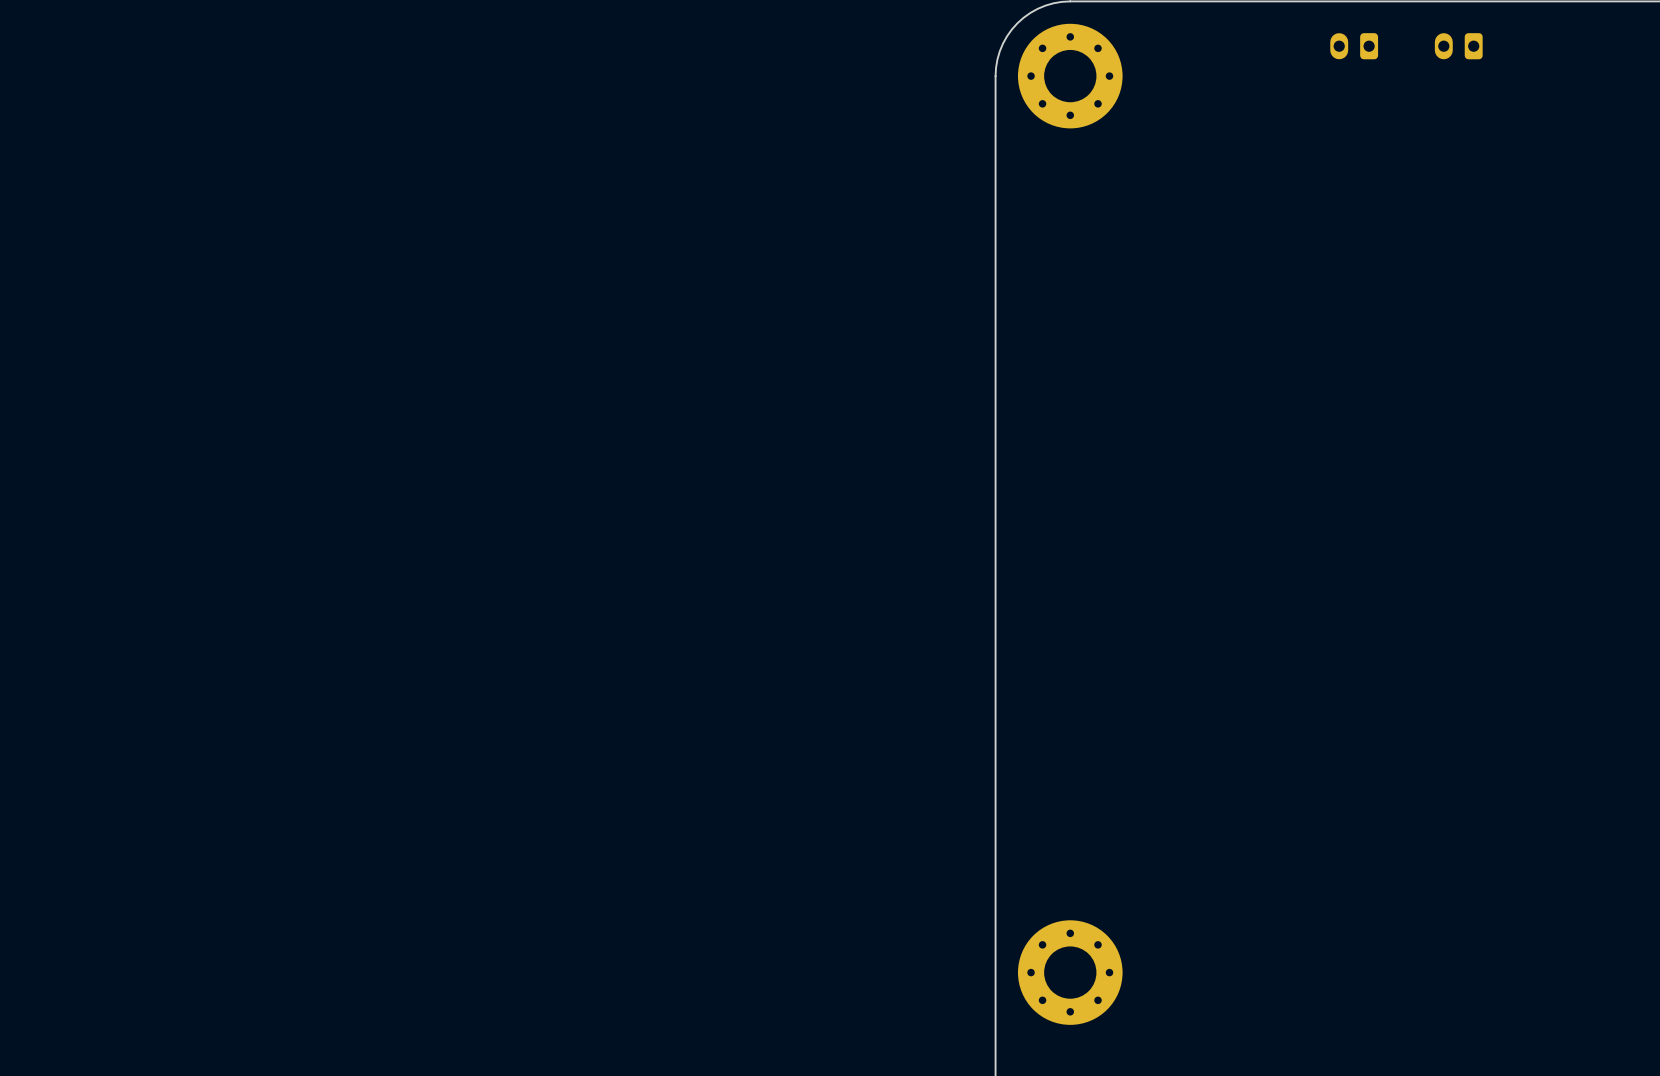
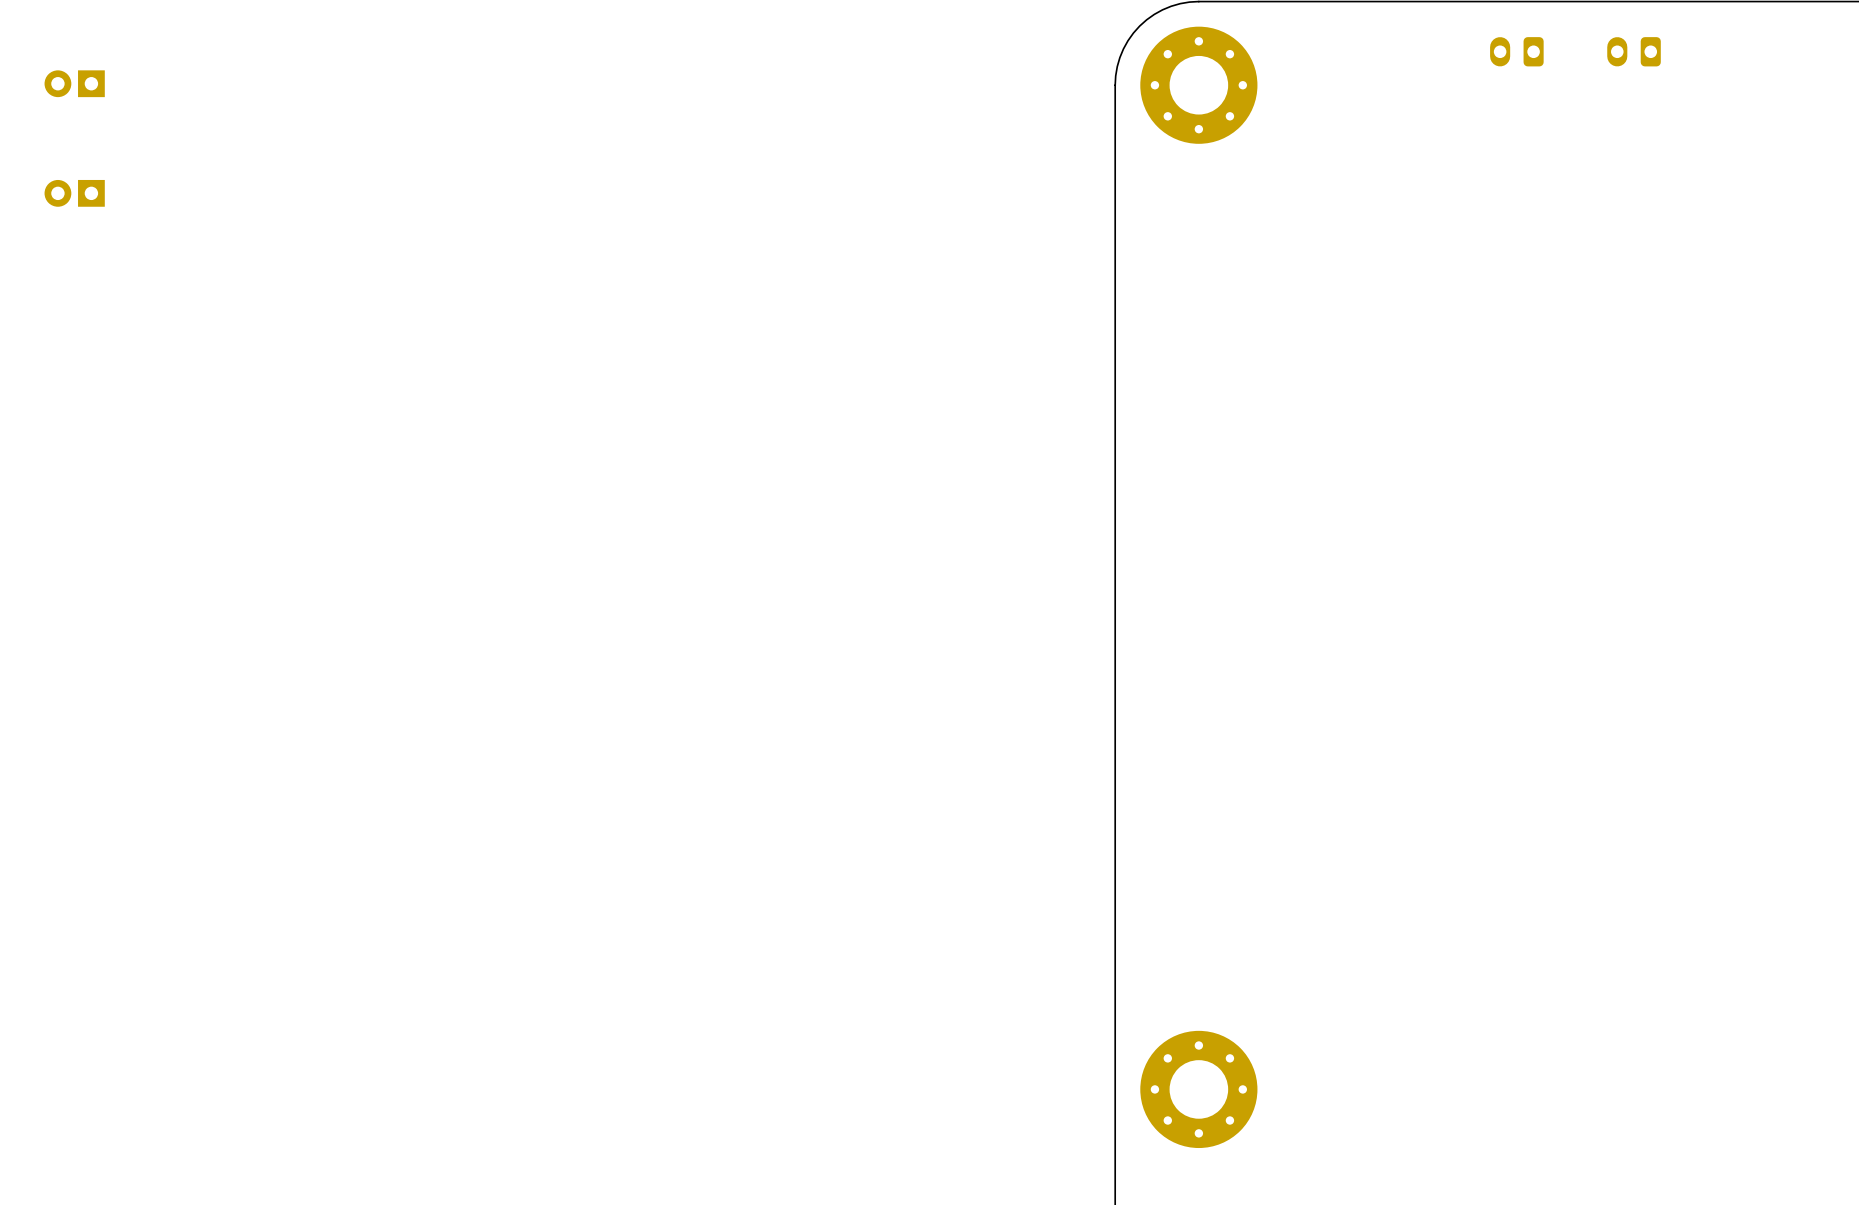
part: none -> (74, 83)
part: none -> (74, 193)

